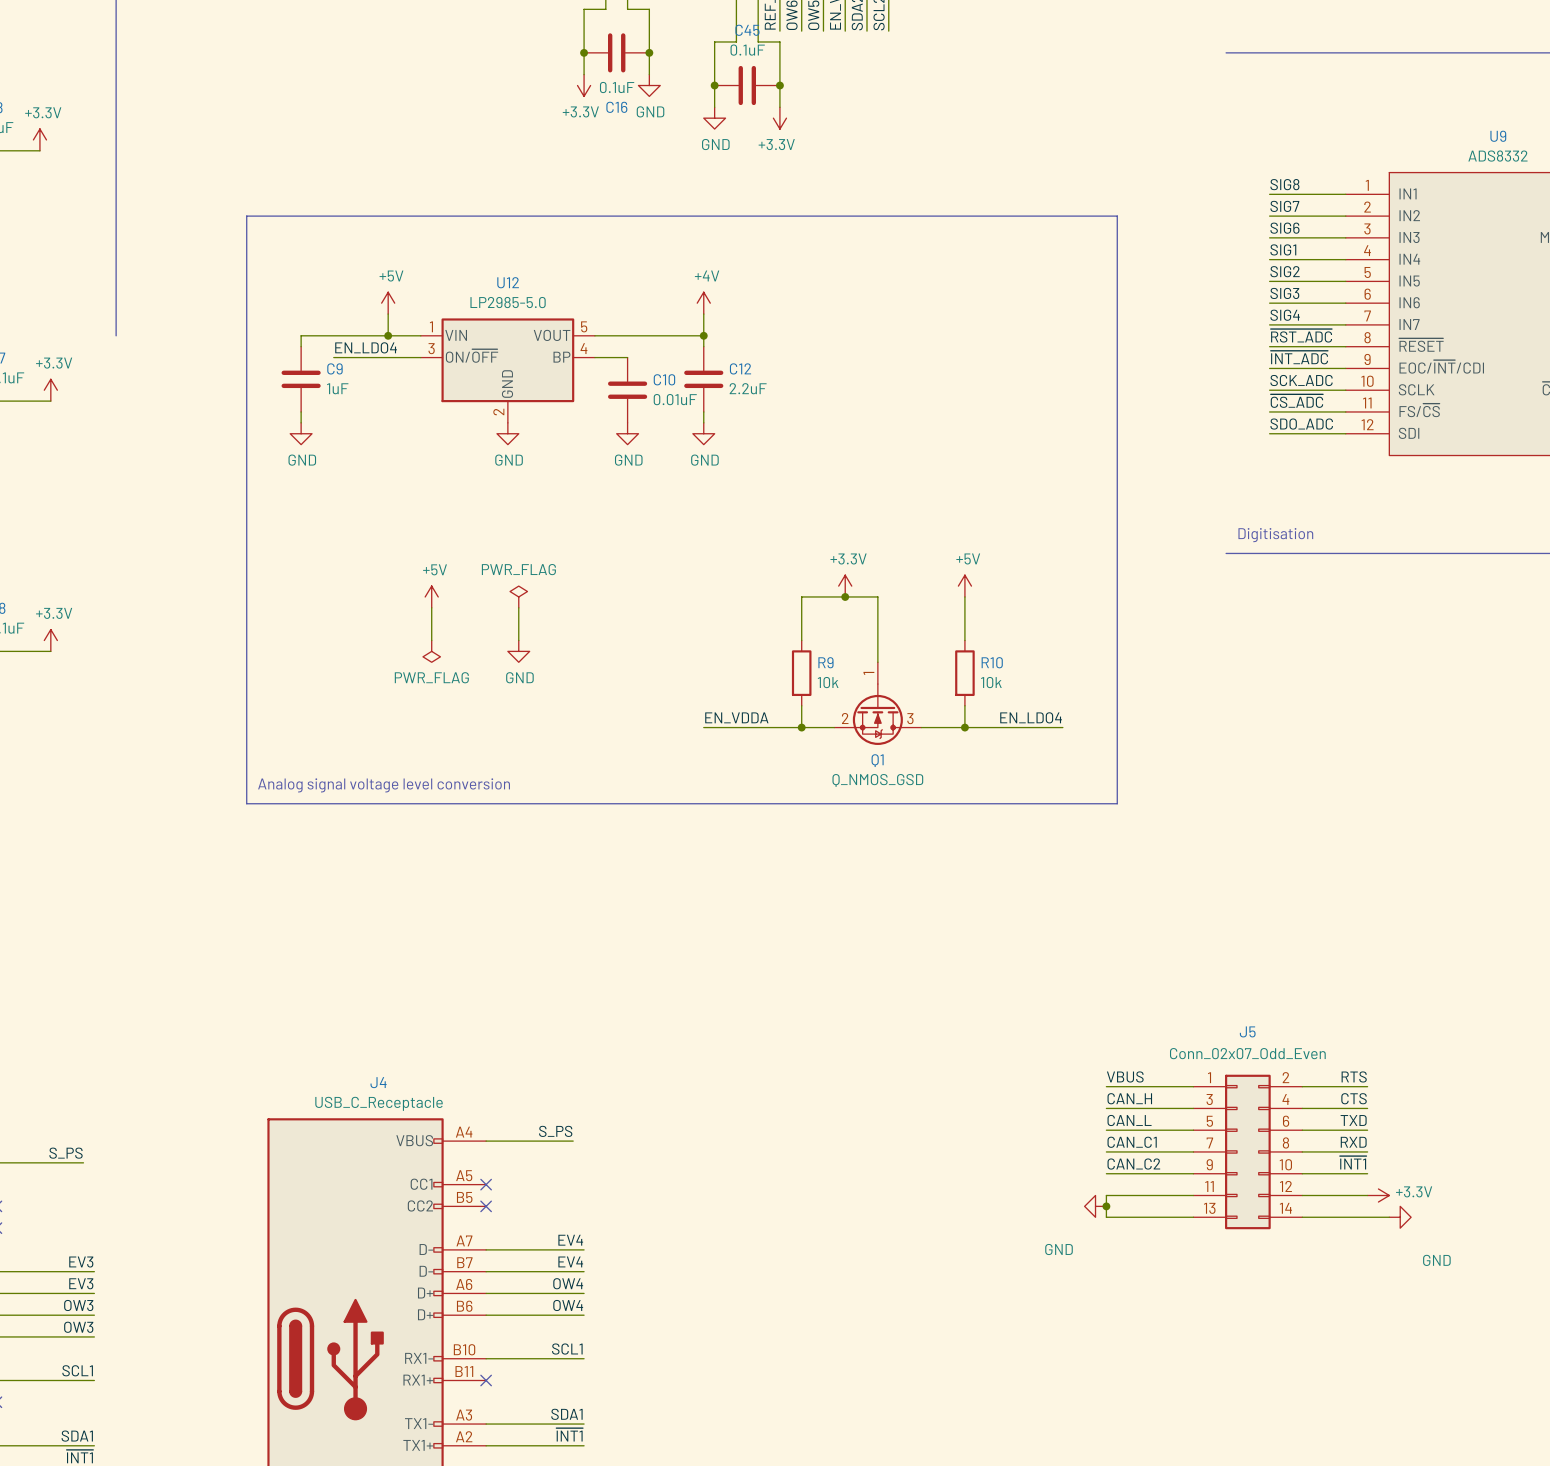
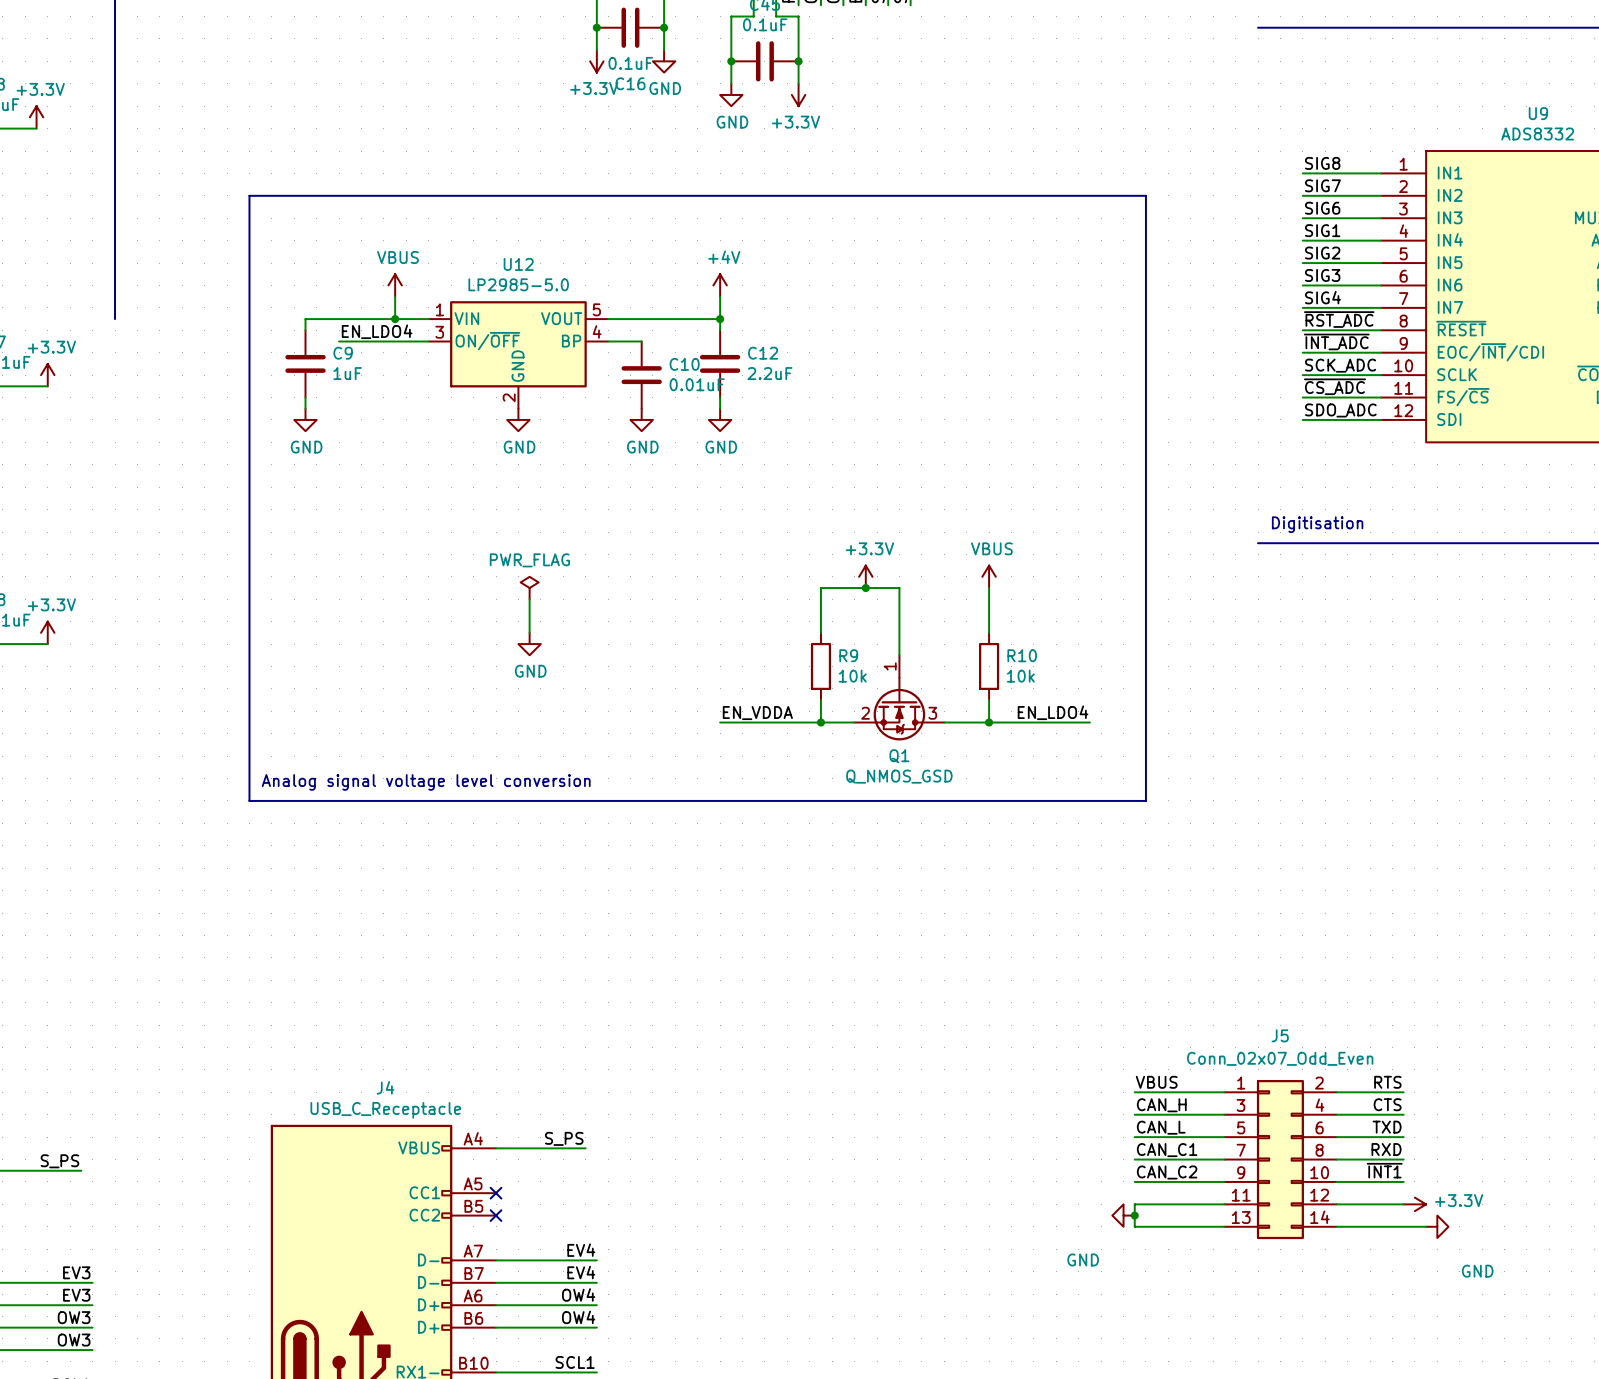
power symbol: +5V (388, 303) -> VBUS (395, 285)
power symbol: +5V (964, 586) -> VBUS (989, 576)
power symbol: +5V (431, 596) -> none
wire: (431, 607) (431, 640) -> none
power symbol: PWR_FLAG (431, 651) -> none

